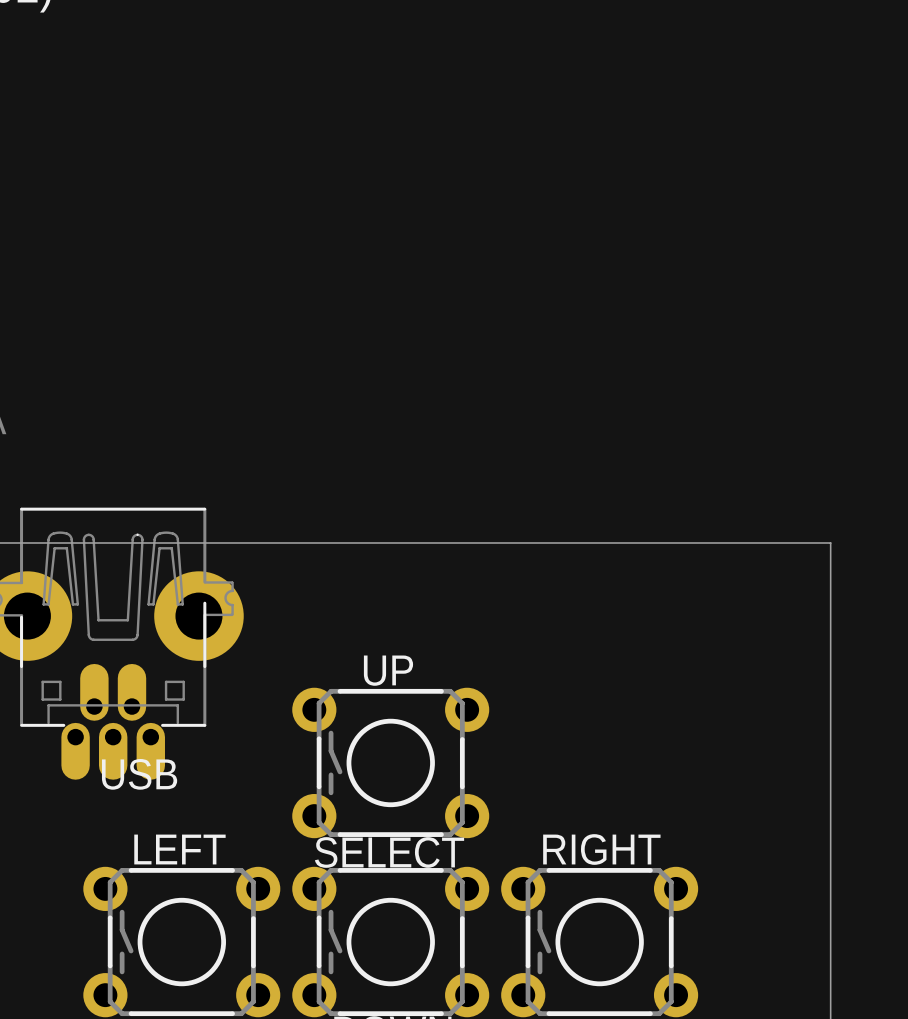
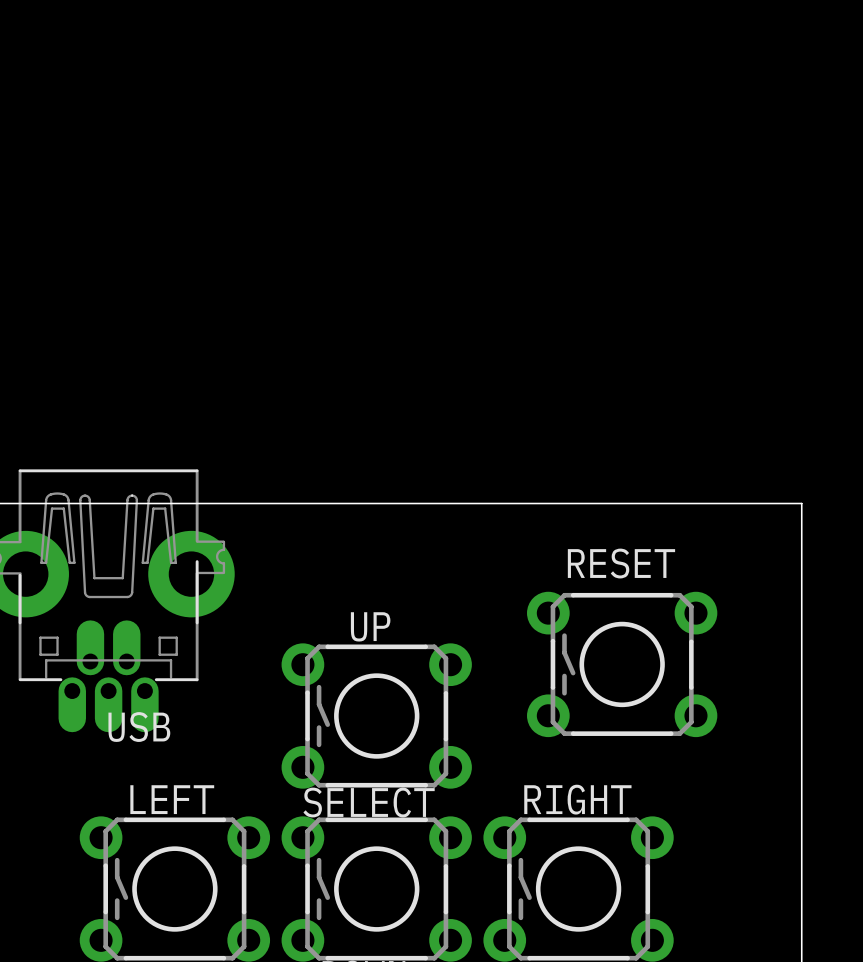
RESET: none -> (622, 664)

